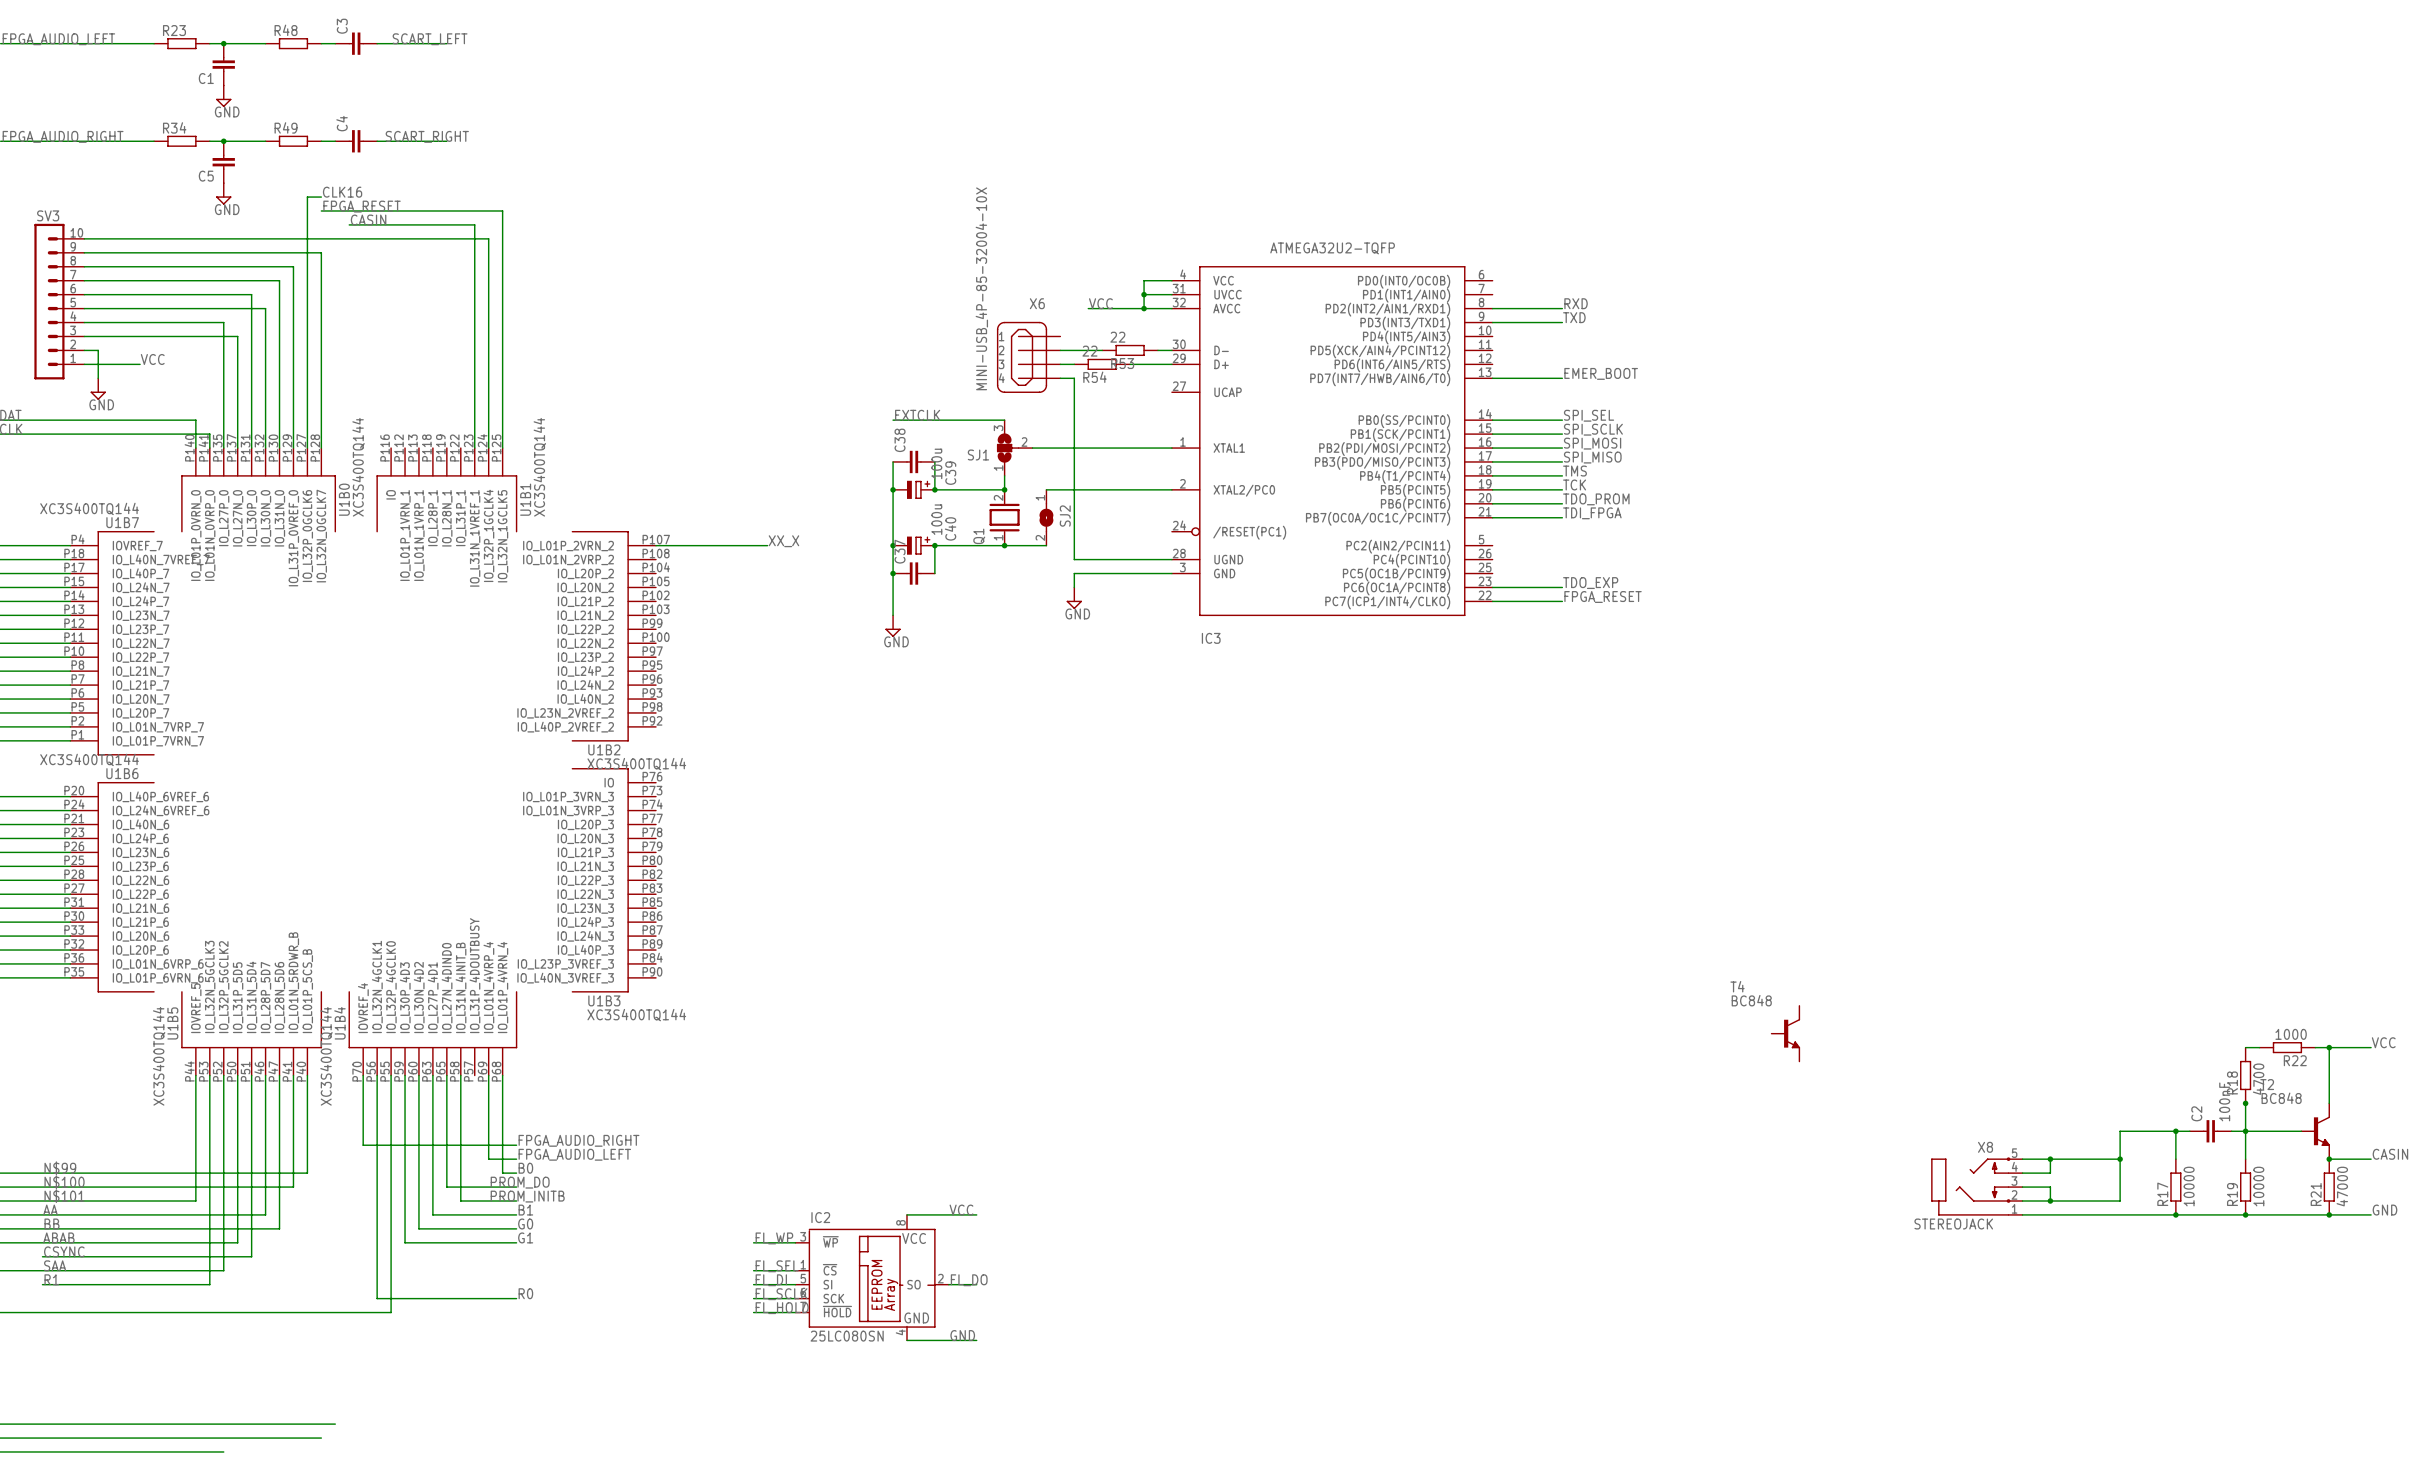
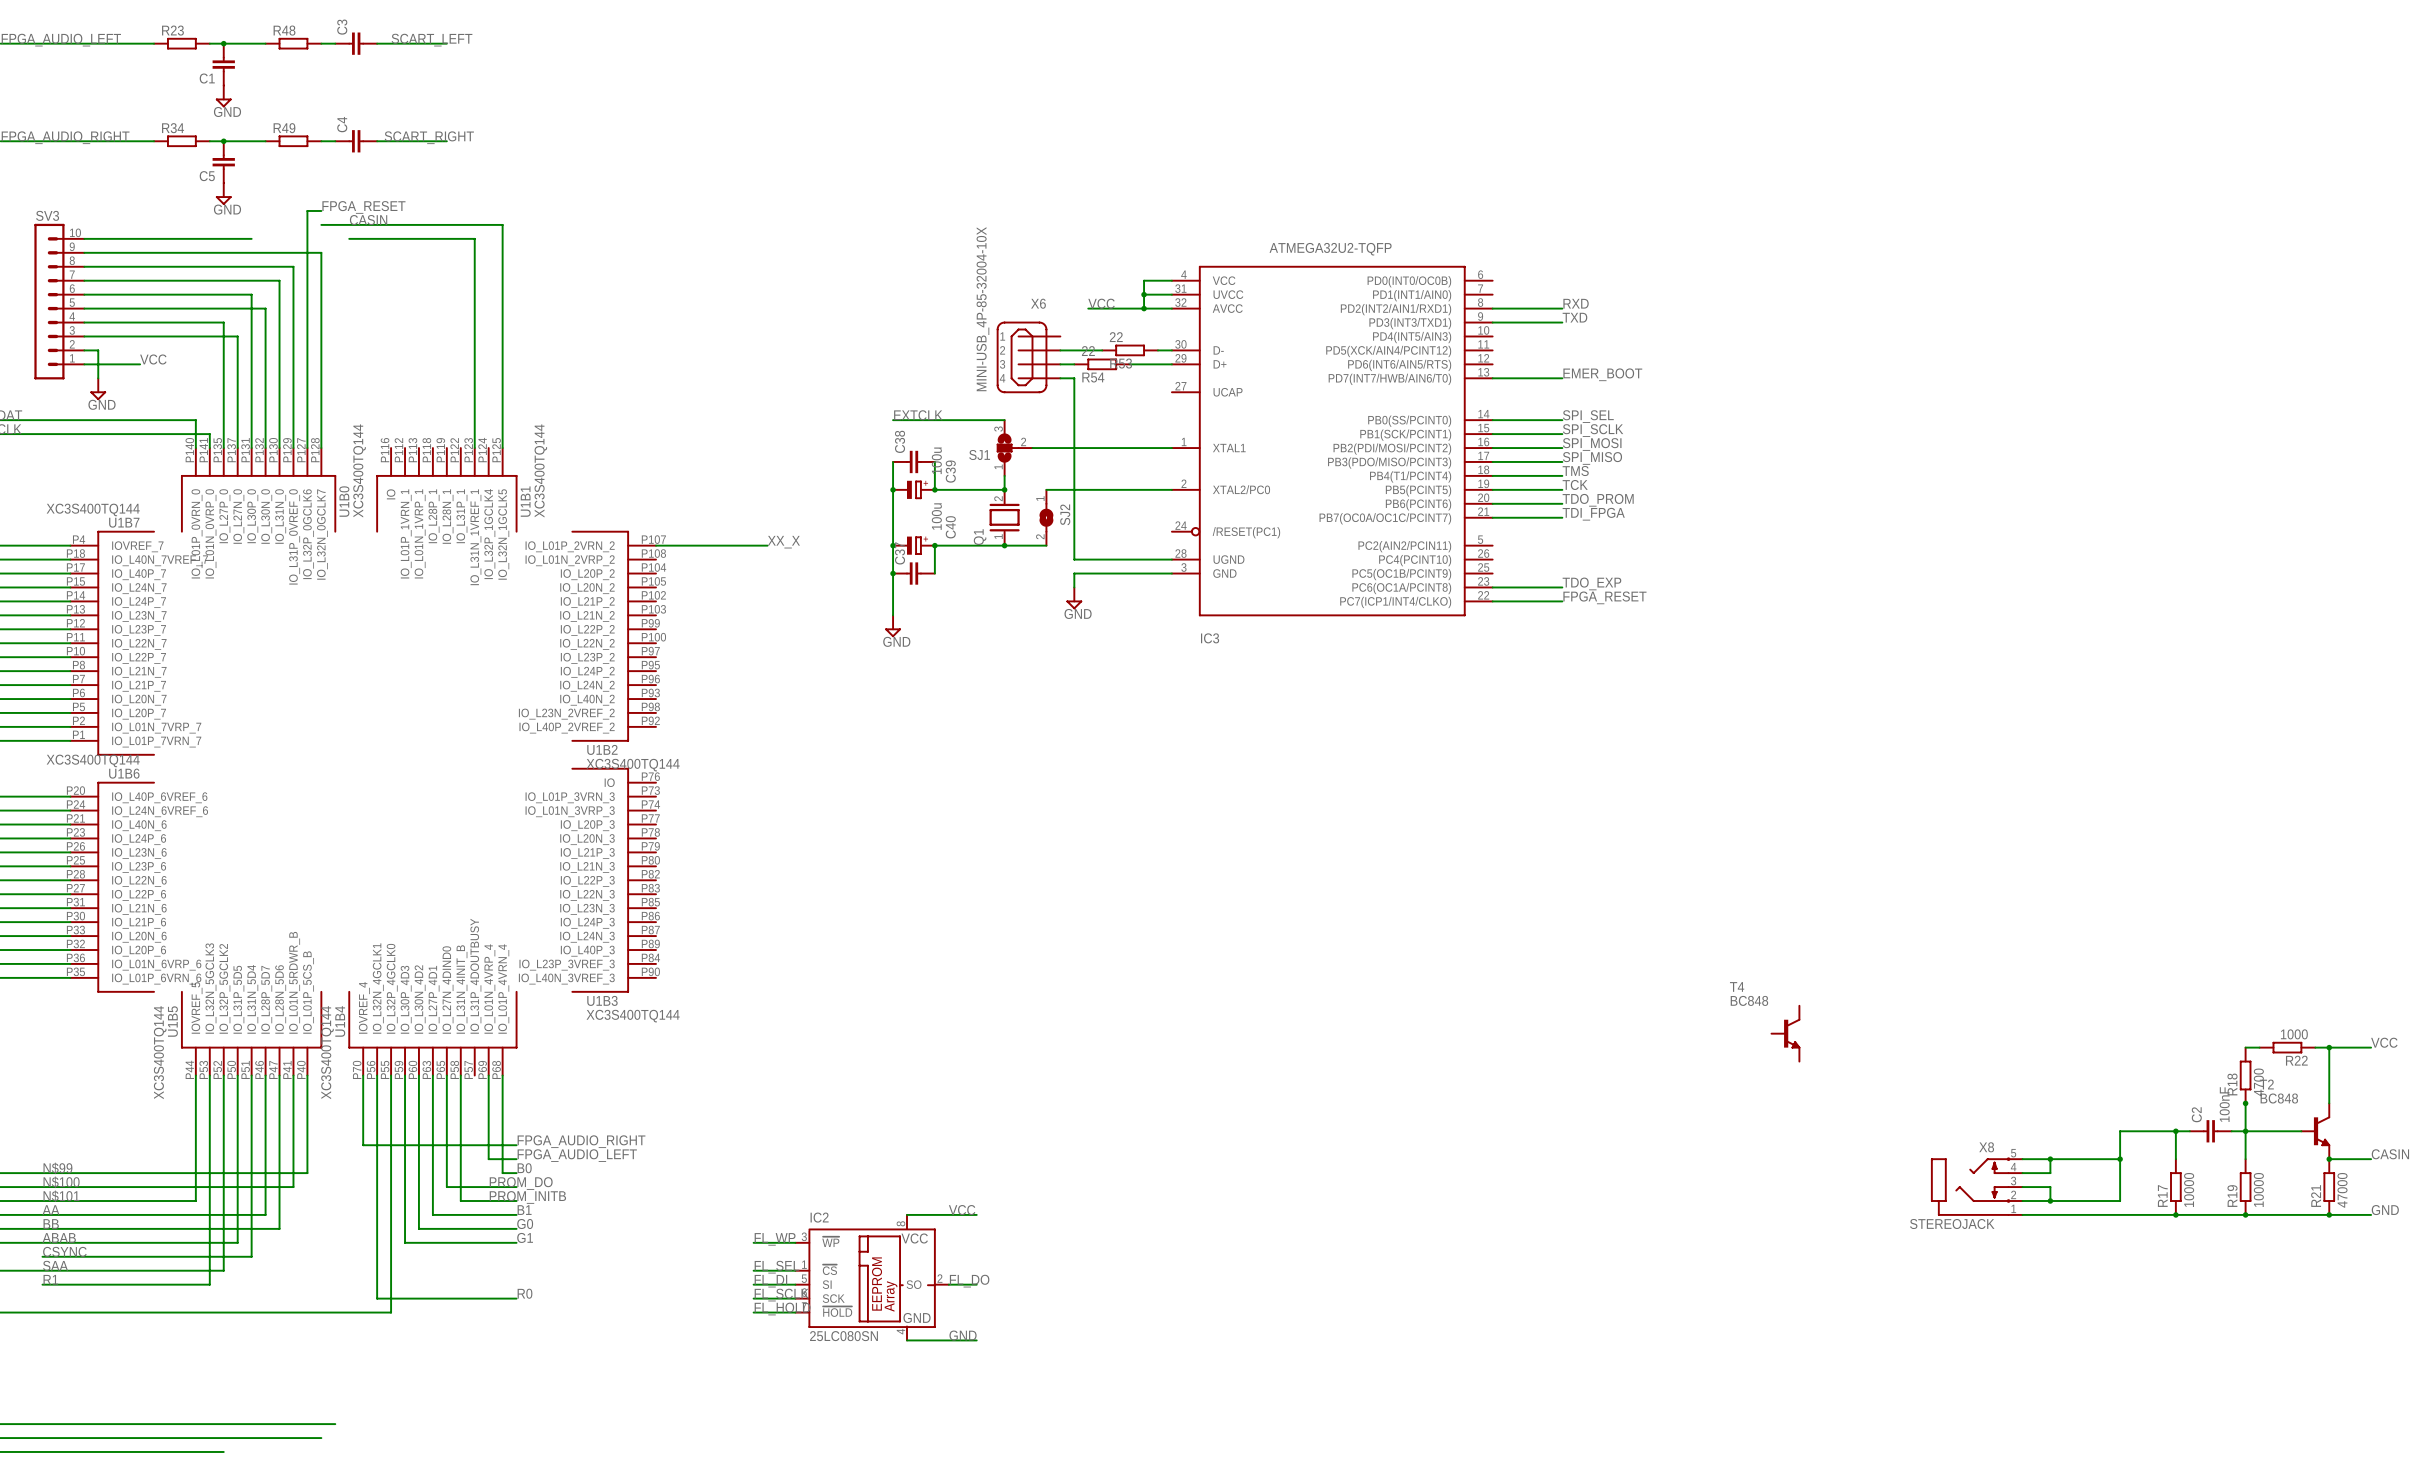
label: CLK16 (342, 192) -> none
wire: (321, 197) (307, 197) (307, 210) -> (321, 210) (307, 210)
wire: (321, 210) (502, 210) (502, 224) -> (474, 224) (502, 224)
wire: none -> (321, 224) (349, 224)
wire: (474, 224) (474, 238) (488, 238) (488, 448) -> none
wire: (251, 238) (349, 238) -> none

